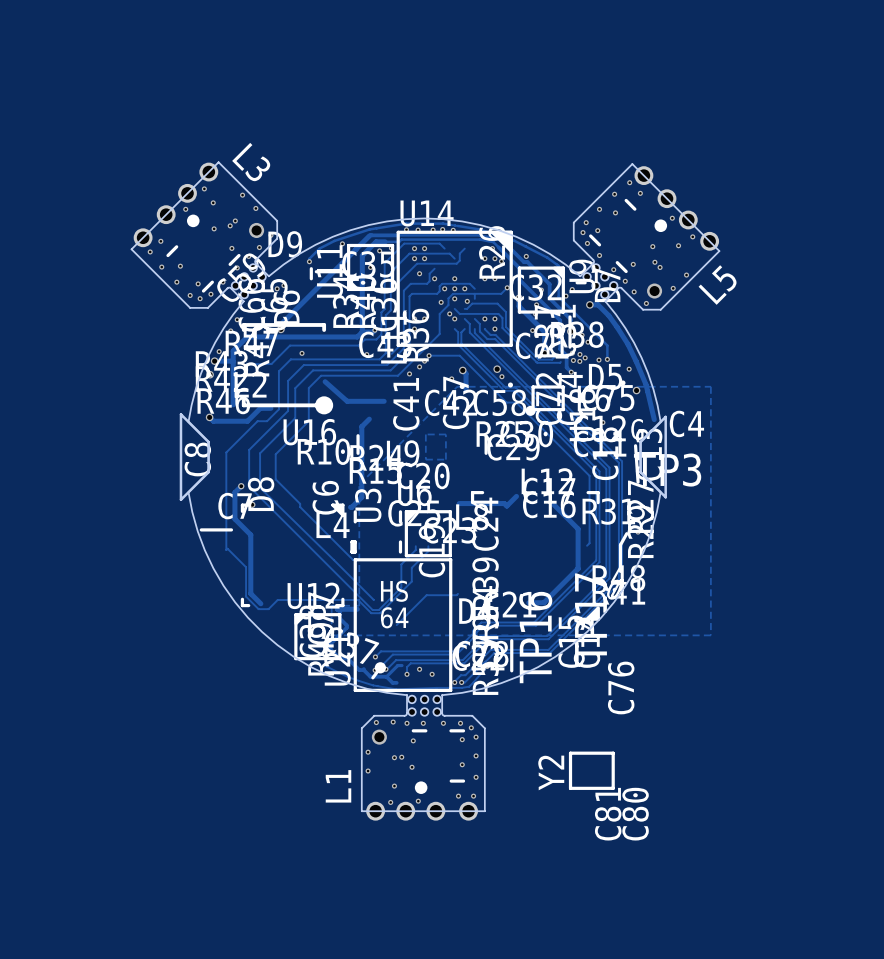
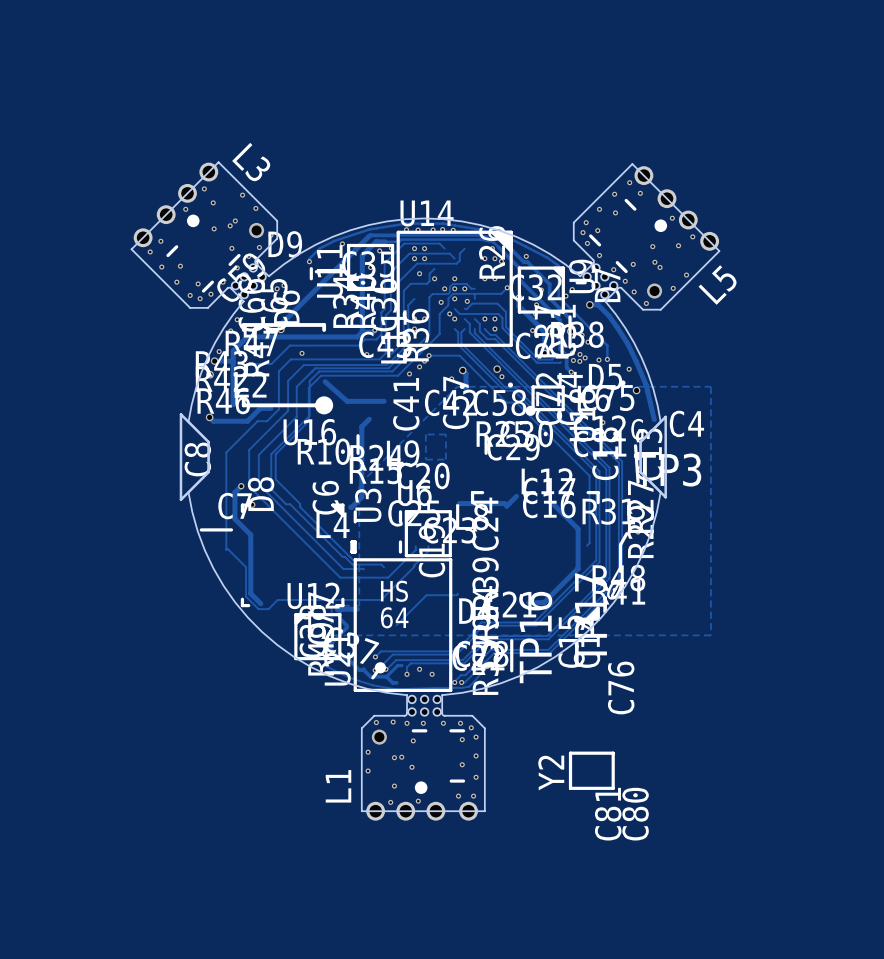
track: (474, 288) (469, 283) (442, 283) (437, 293) (412, 293) (409, 296) (409, 351) (390, 370) (313, 370) -> (414, 298) (408, 305) (408, 348) (388, 368) (315, 368) (313, 370)
track: none -> (474, 288) (471, 288) (466, 284) (452, 284) (448, 294) (432, 294) (429, 297) (429, 334) (392, 371) (319, 371) (309, 381) (309, 415) (271, 454) (271, 489) (286, 504) (290, 504) (352, 564) (381, 564) (384, 567)
track: (296, 386) (295, 418) (260, 453) (260, 487) (373, 599) -> (296, 386) (296, 416) (258, 454) (258, 484) (343, 569) (363, 569)
track: (401, 564) (401, 587) (378, 610) (372, 610) (340, 577) -> (401, 564) (388, 577) (340, 577)
track: (414, 565) (411, 567) (411, 581) (380, 613) (371, 613) (358, 599) -> (414, 565) (381, 599) (358, 599)

